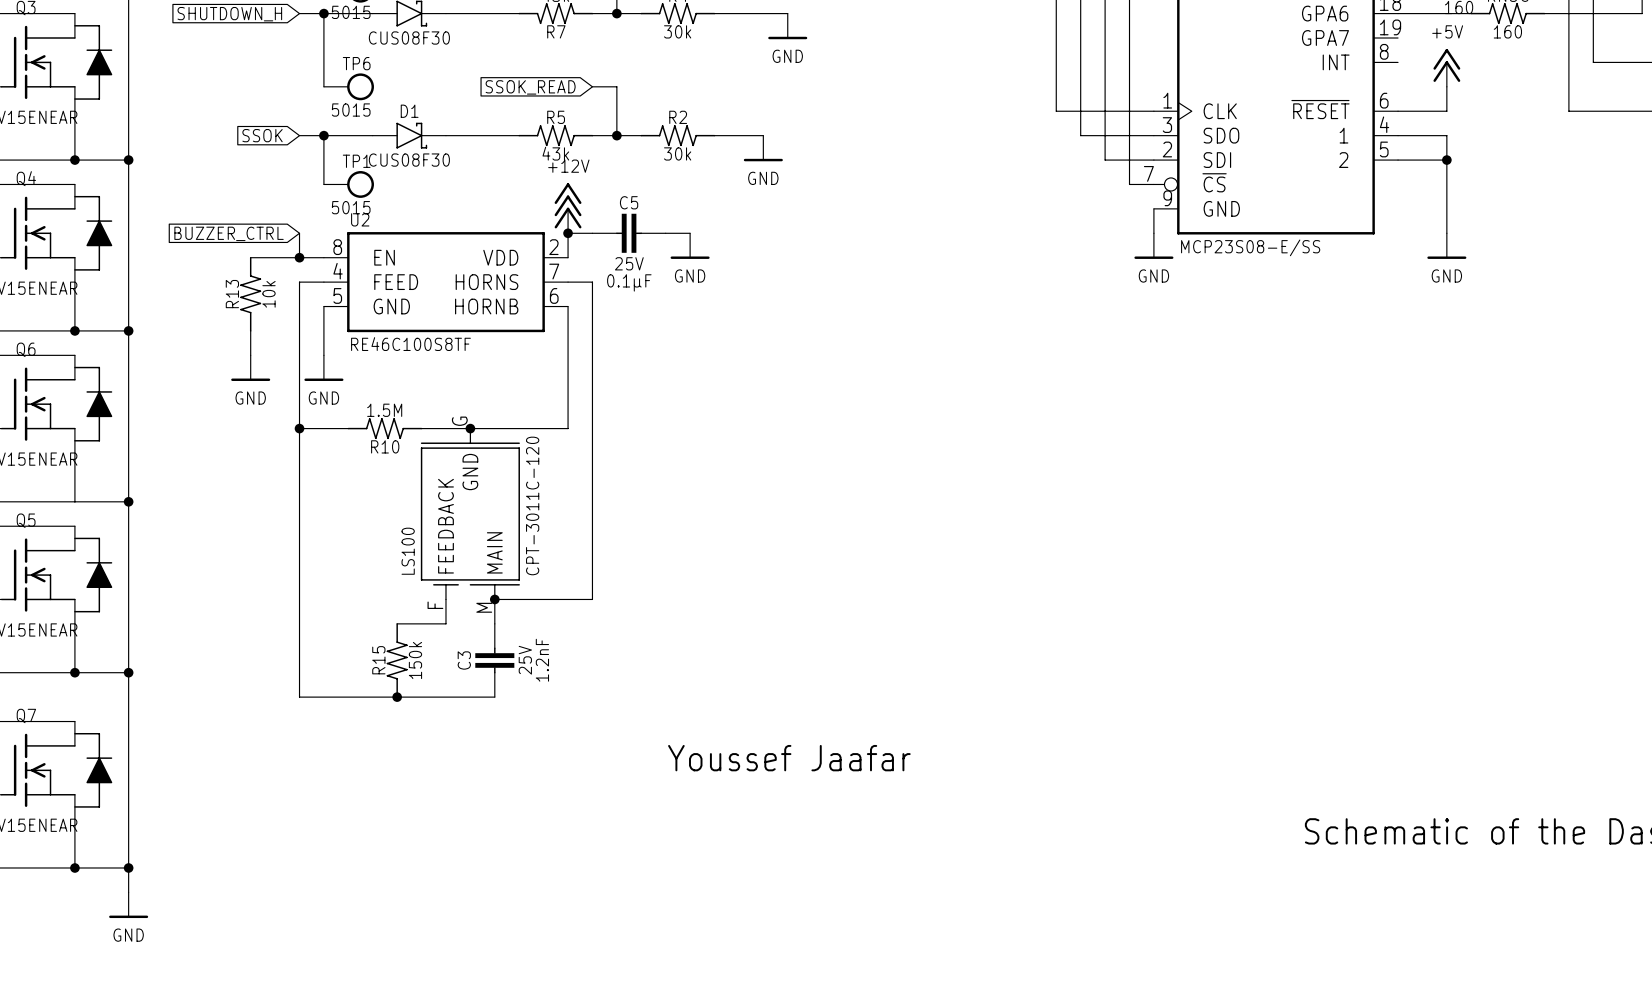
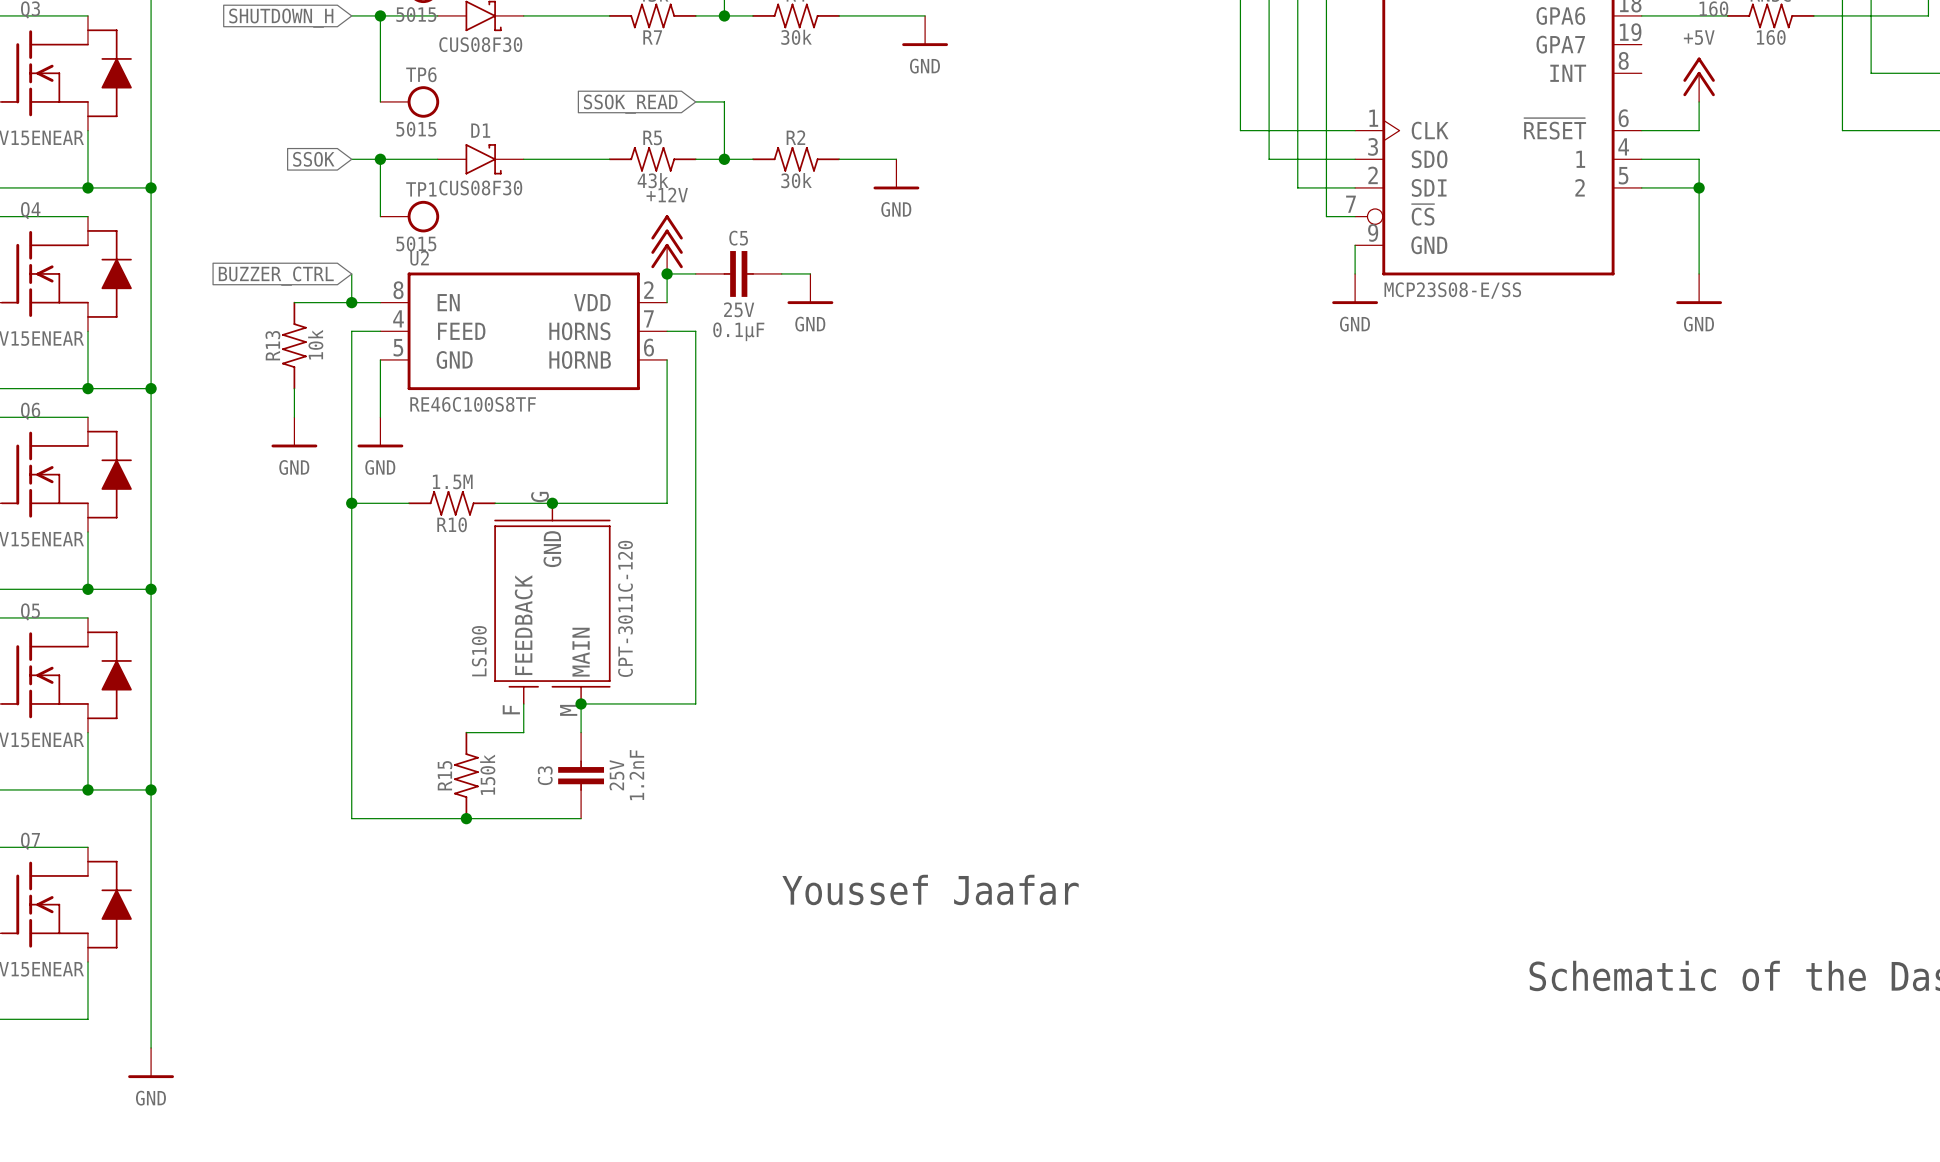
junction: none -> (87, 589)
wire: (74, 867) (128, 867) -> none
junction: (74, 867) -> none
junction: (128, 867) -> none

